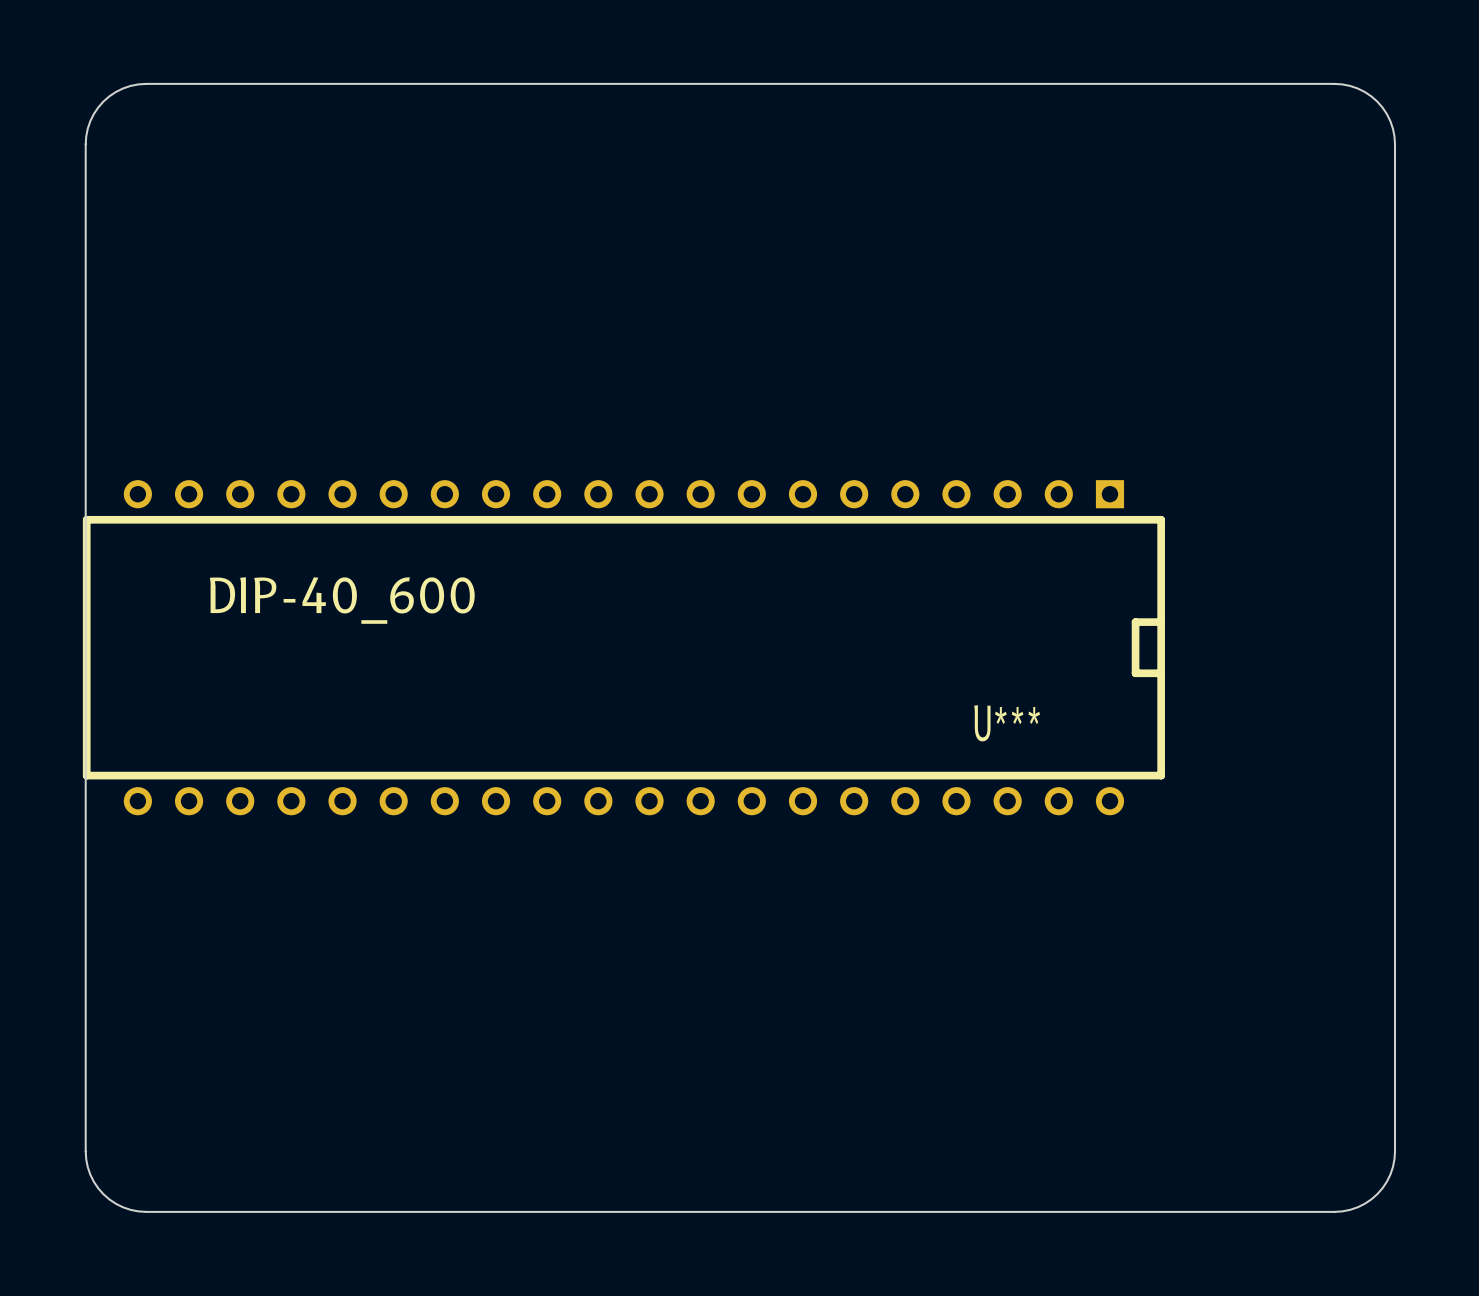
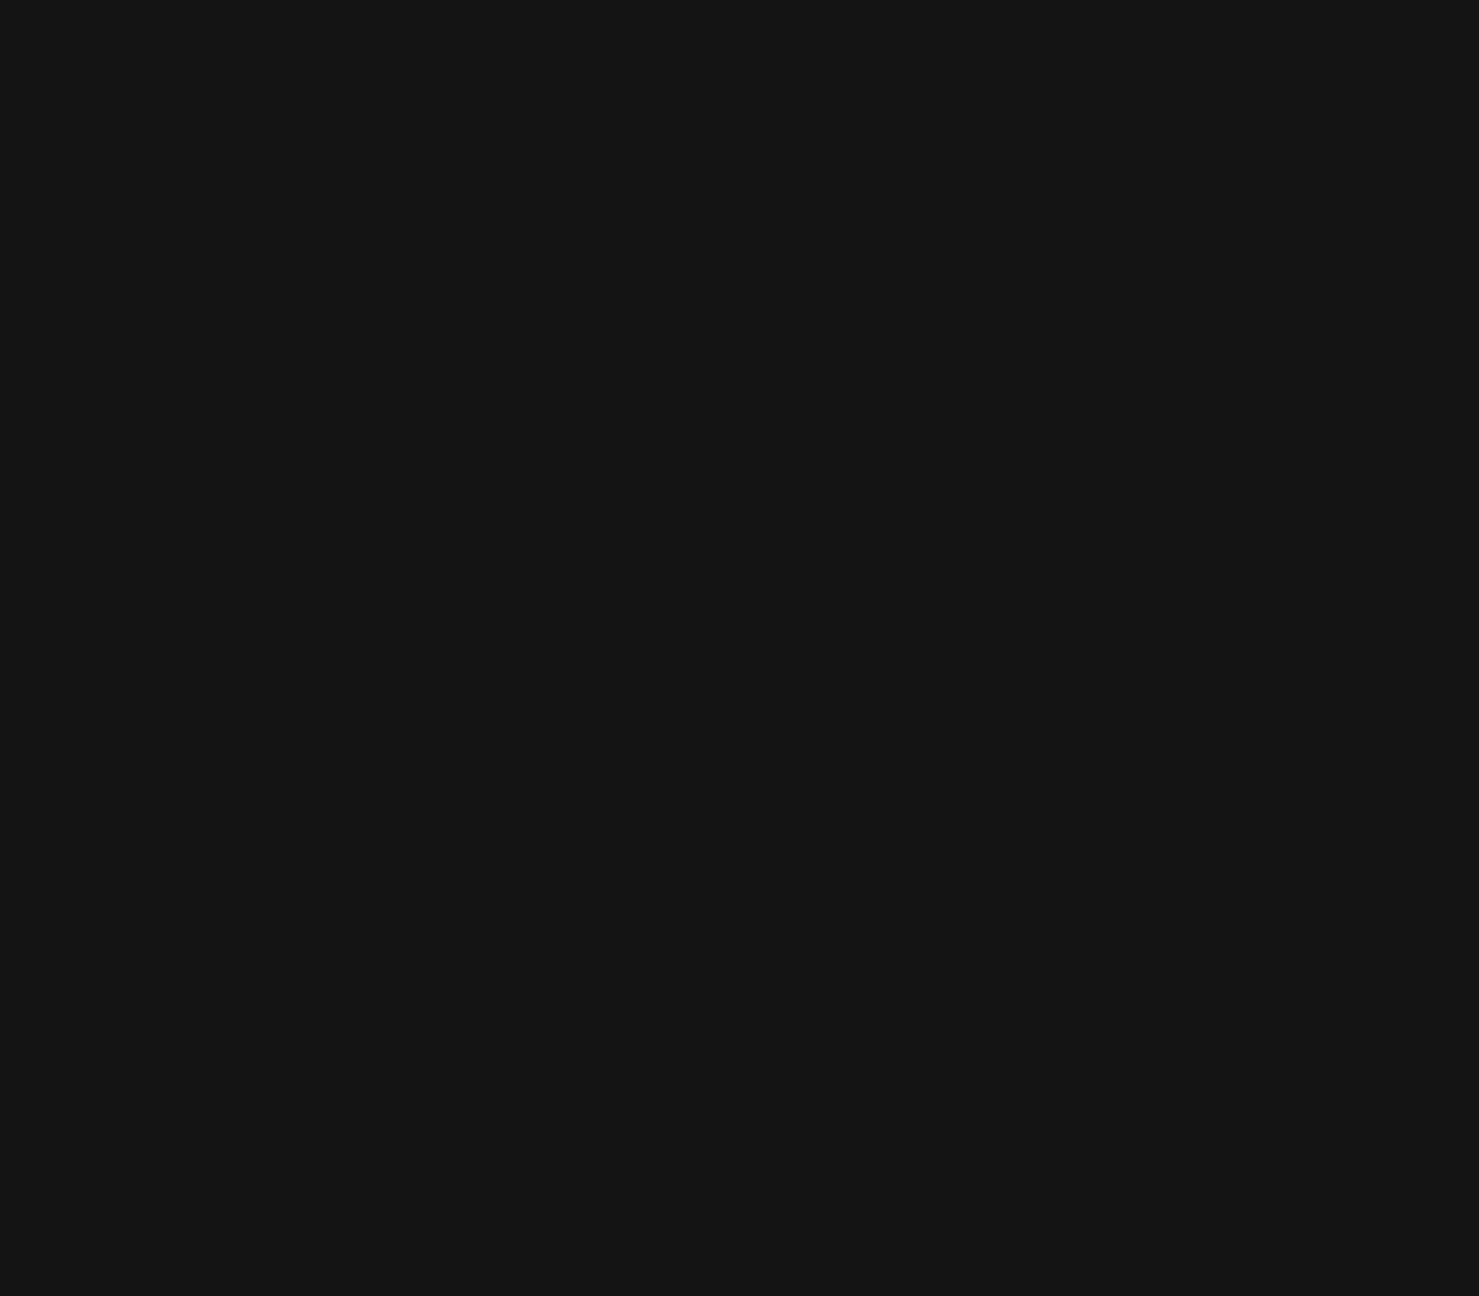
board edge: (146, 83) (1334, 83) (1357, 88) (1377, 101) (1390, 121) (1395, 144) (1395, 1151) (1390, 1174) (1377, 1194) (1357, 1207) (1334, 1211) (146, 1211) (123, 1207) (103, 1194) (90, 1174) (85, 1151) (85, 144) (90, 121) (103, 101) (123, 88) (146, 83) -> none
U***: DIP-40_600 (623, 647) -> none

